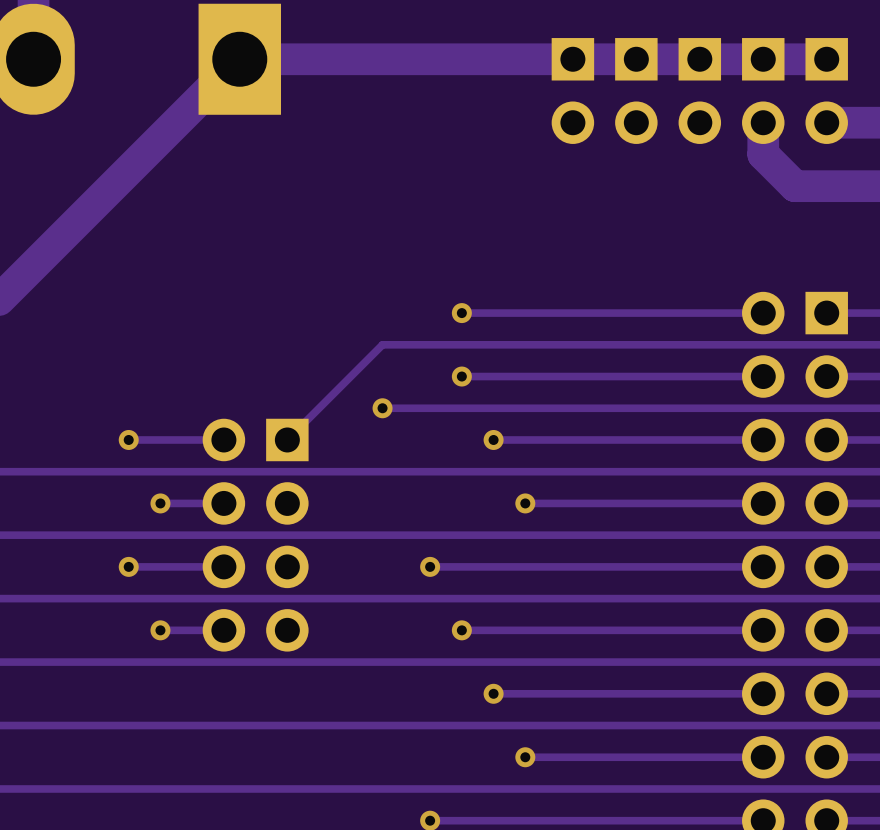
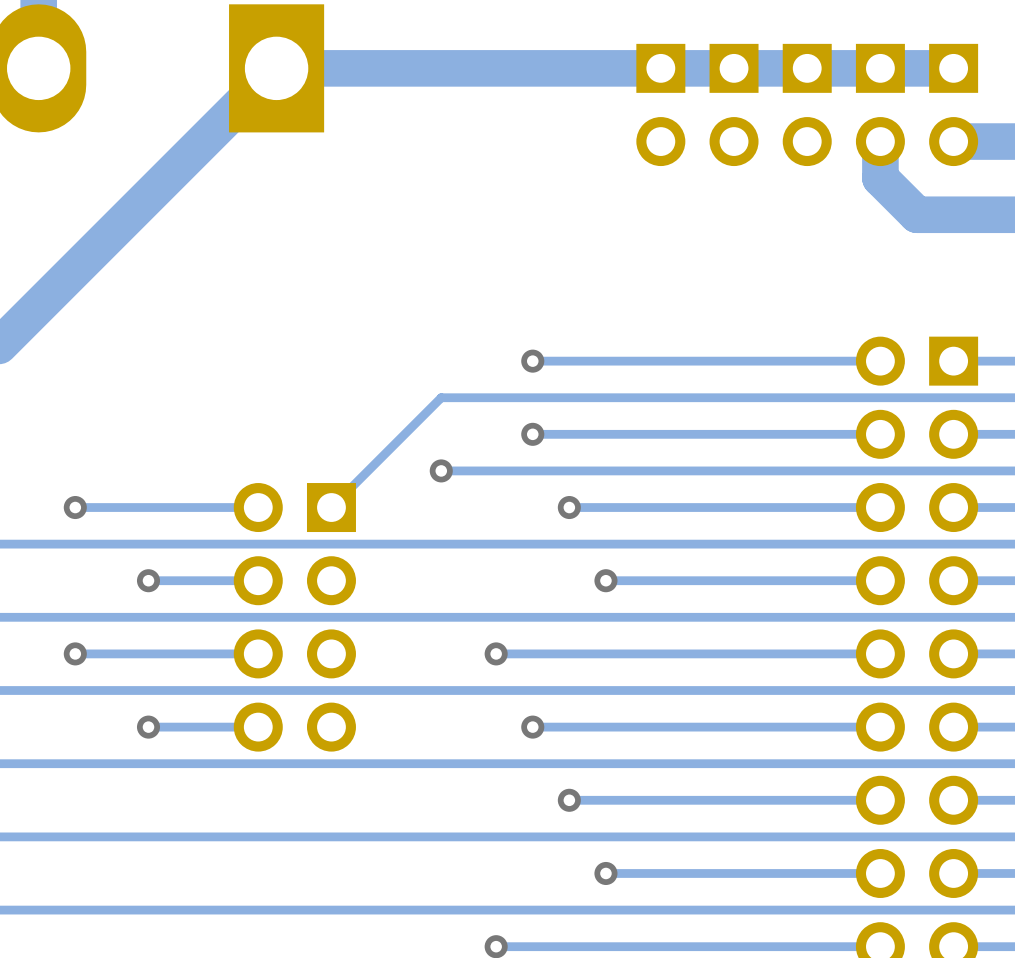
via: none -> (75, 507)
track: none -> (148, 507) (75, 507)
via: (128, 439) -> none
via: none -> (148, 580)
track: none -> (185, 580) (148, 580)
via: (160, 503) -> none
via: none -> (75, 653)
track: none -> (148, 653) (75, 653)
via: (128, 566) -> none
via: none -> (148, 727)
track: none -> (185, 727) (148, 727)
via: (160, 630) -> none

